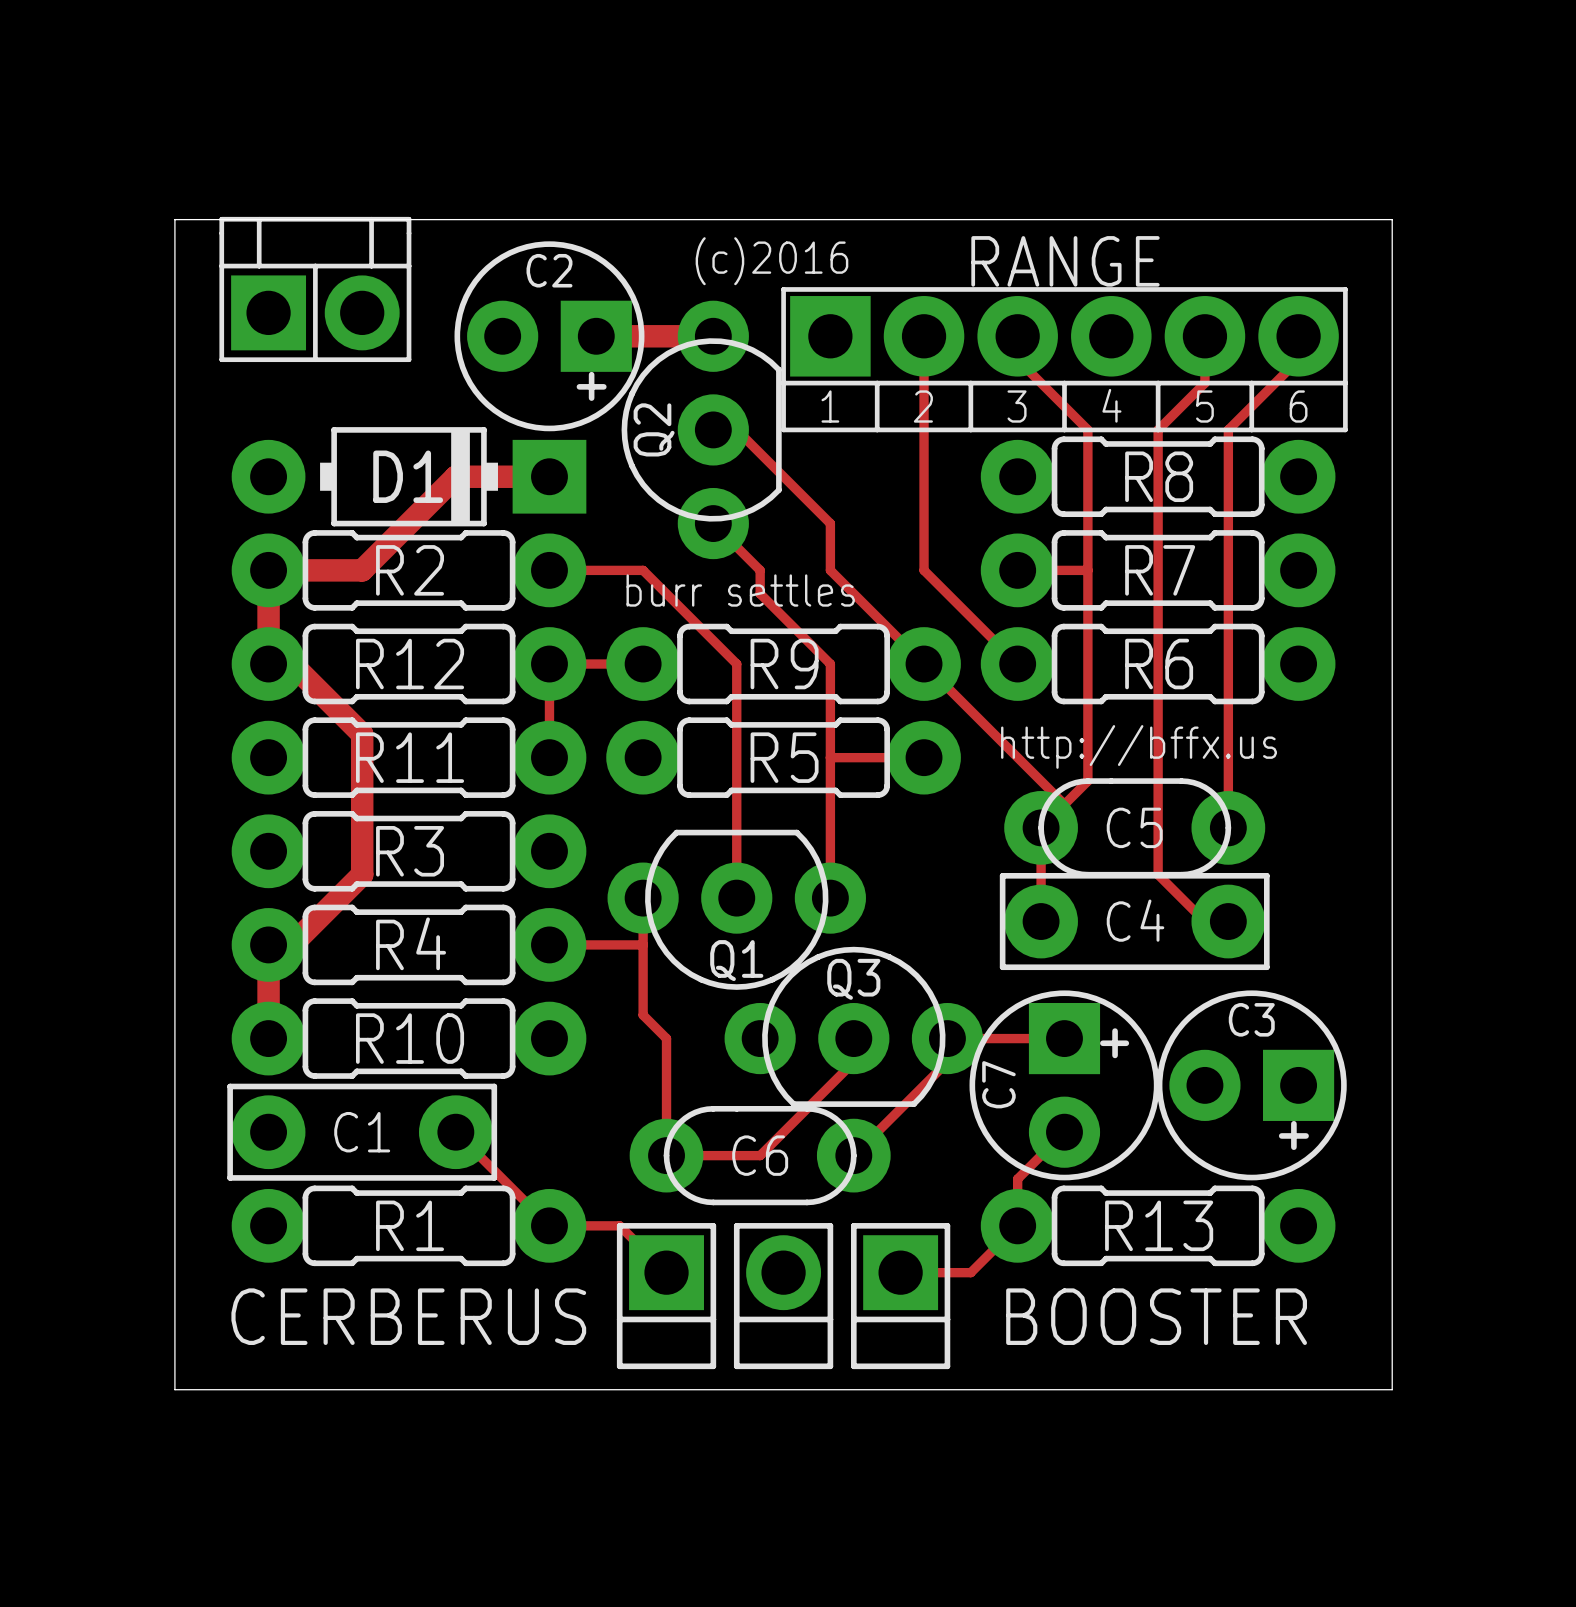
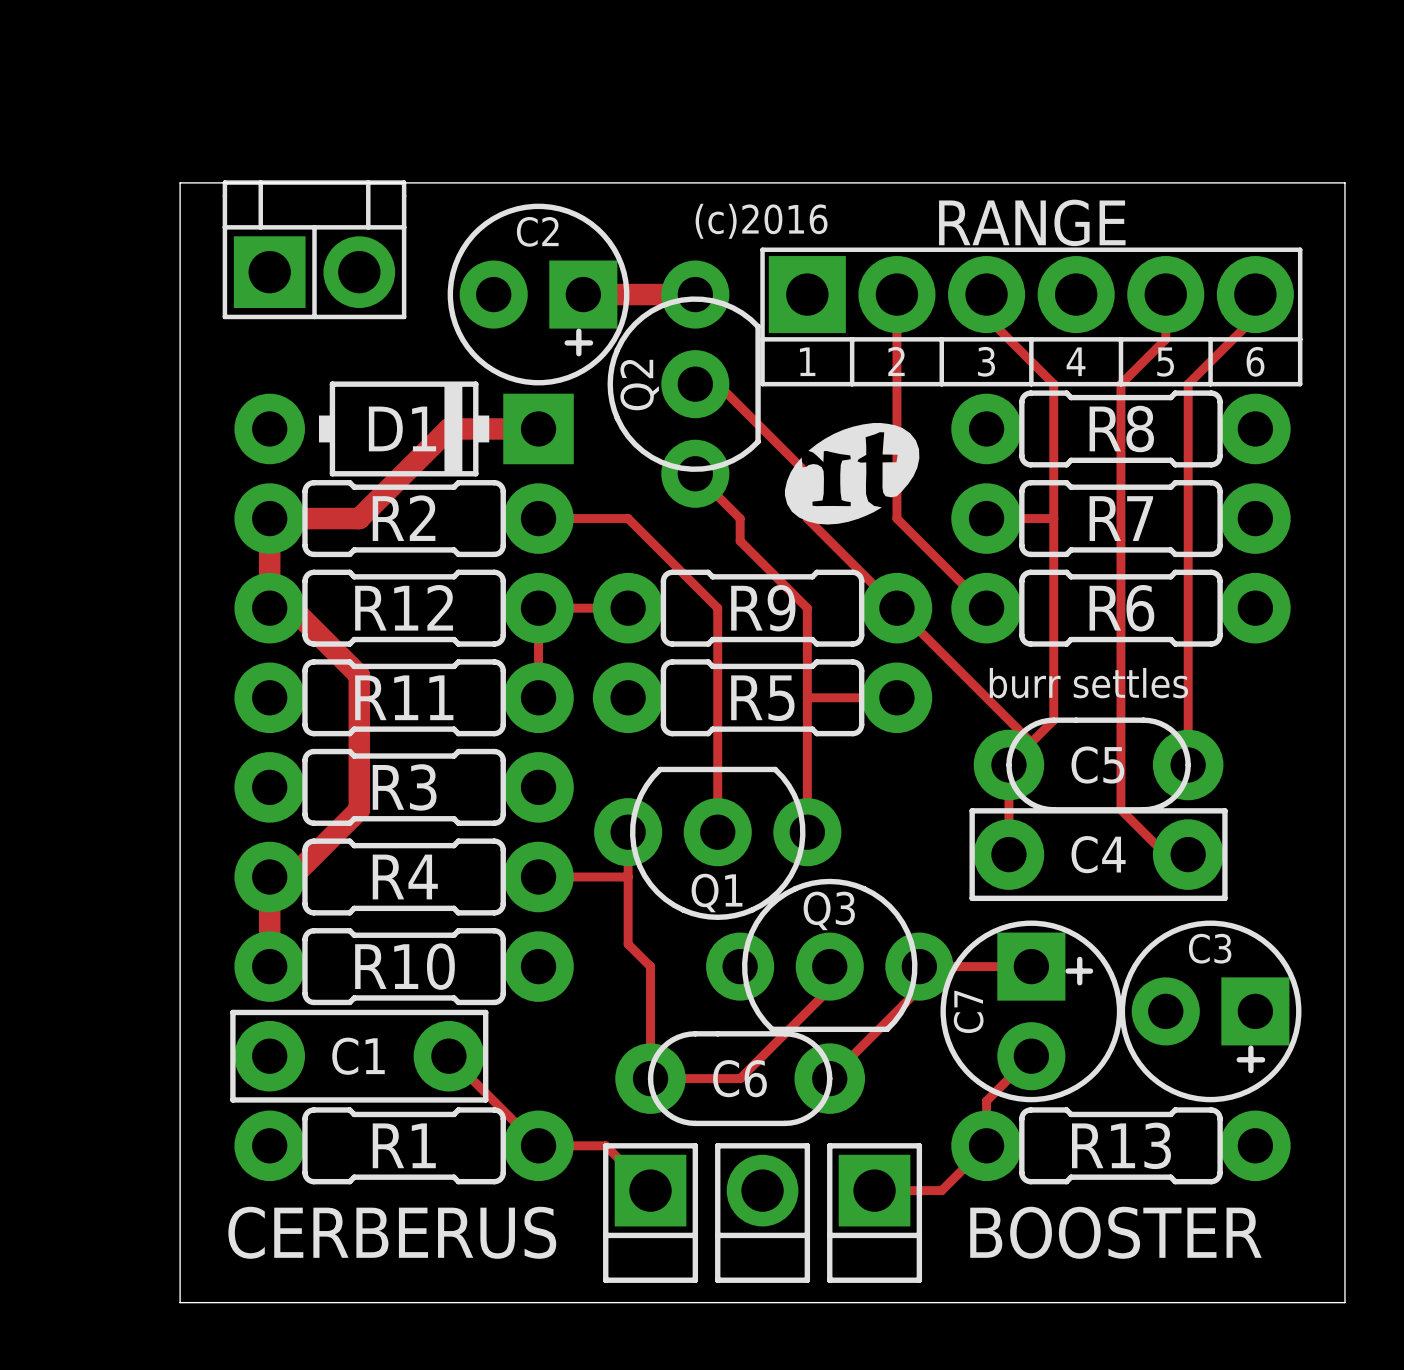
drawing: none -> [784, 423, 920, 525]
text: burr settles (740, 590) -> none
text: http://bffx.us (1139, 746) -> burr settles (1088, 683)

